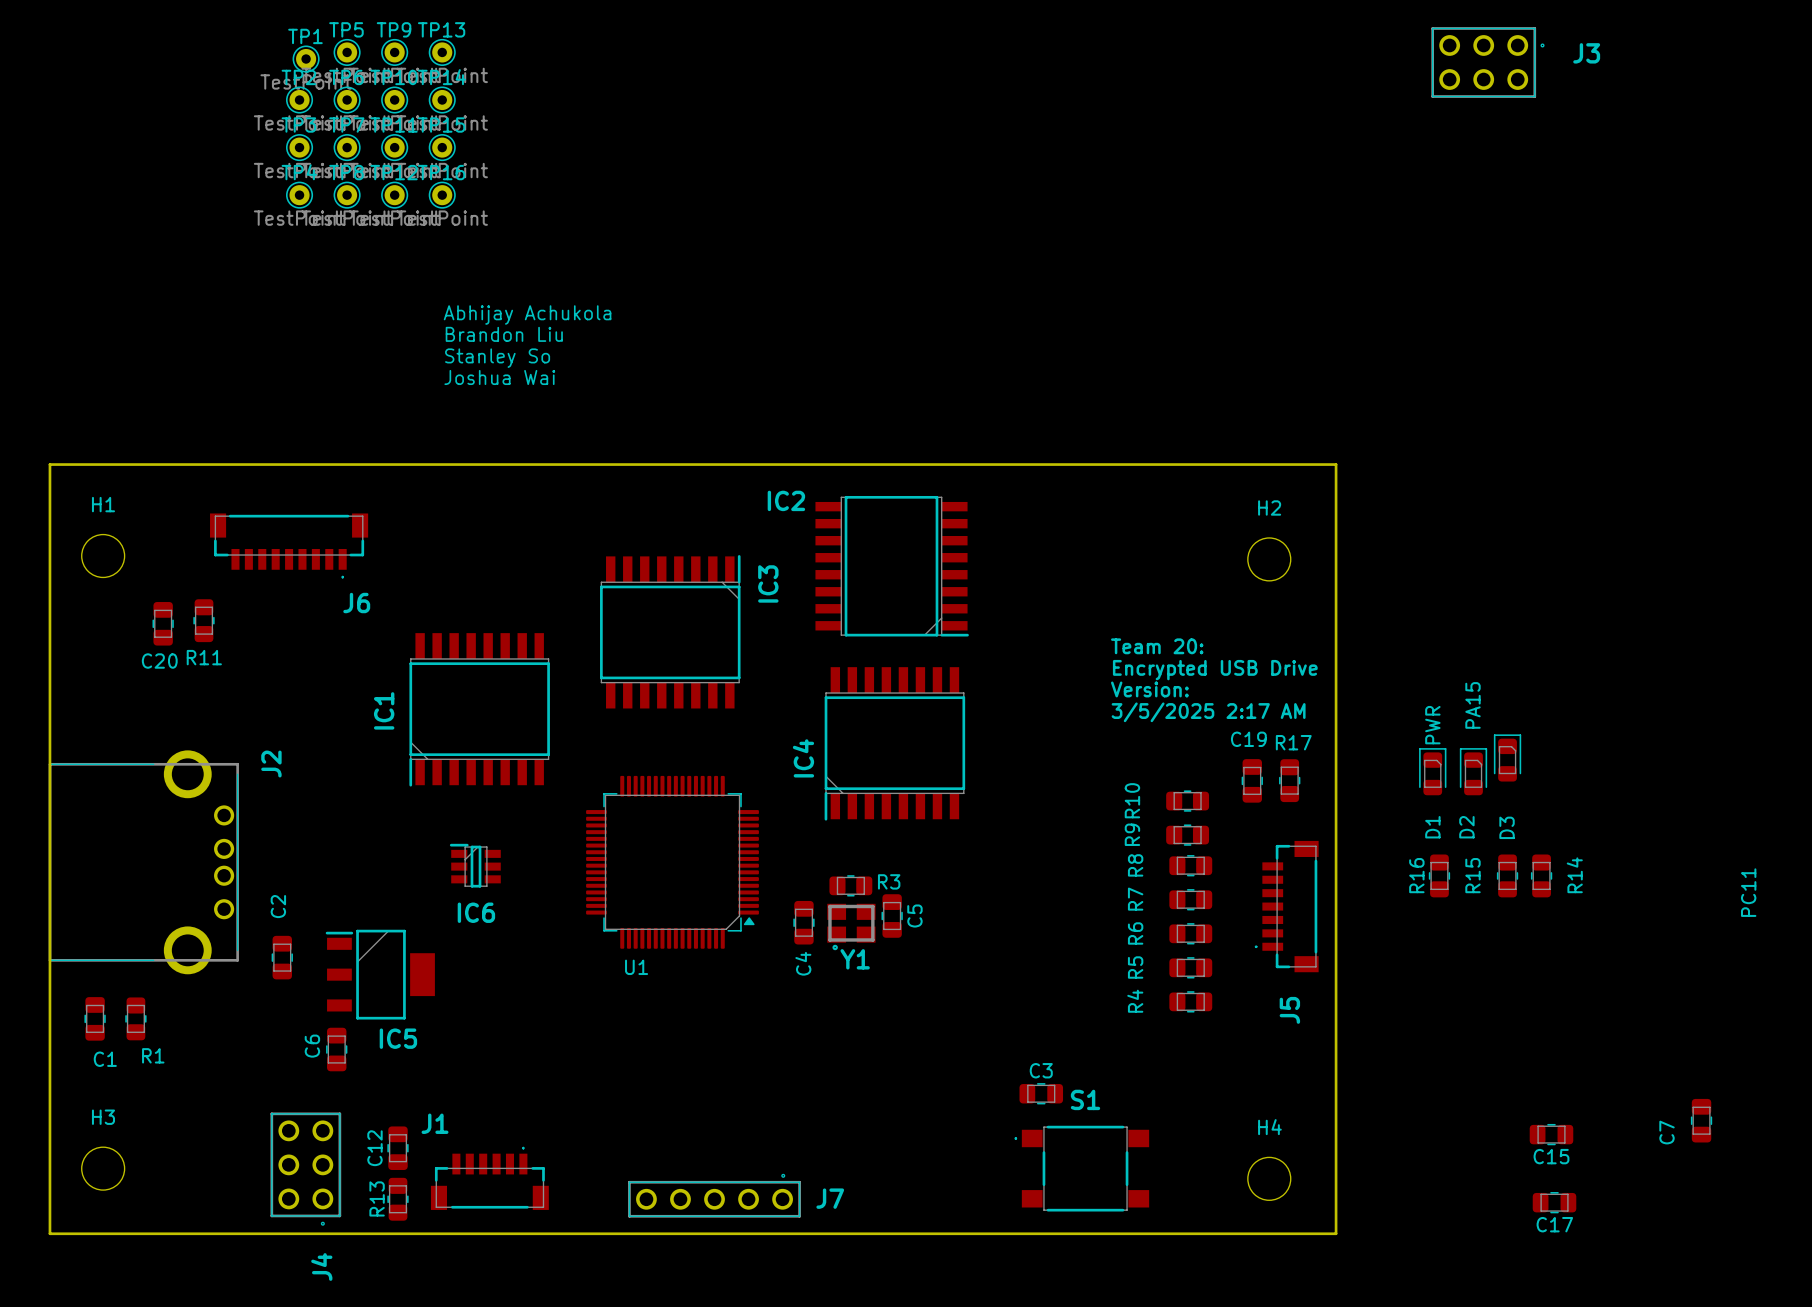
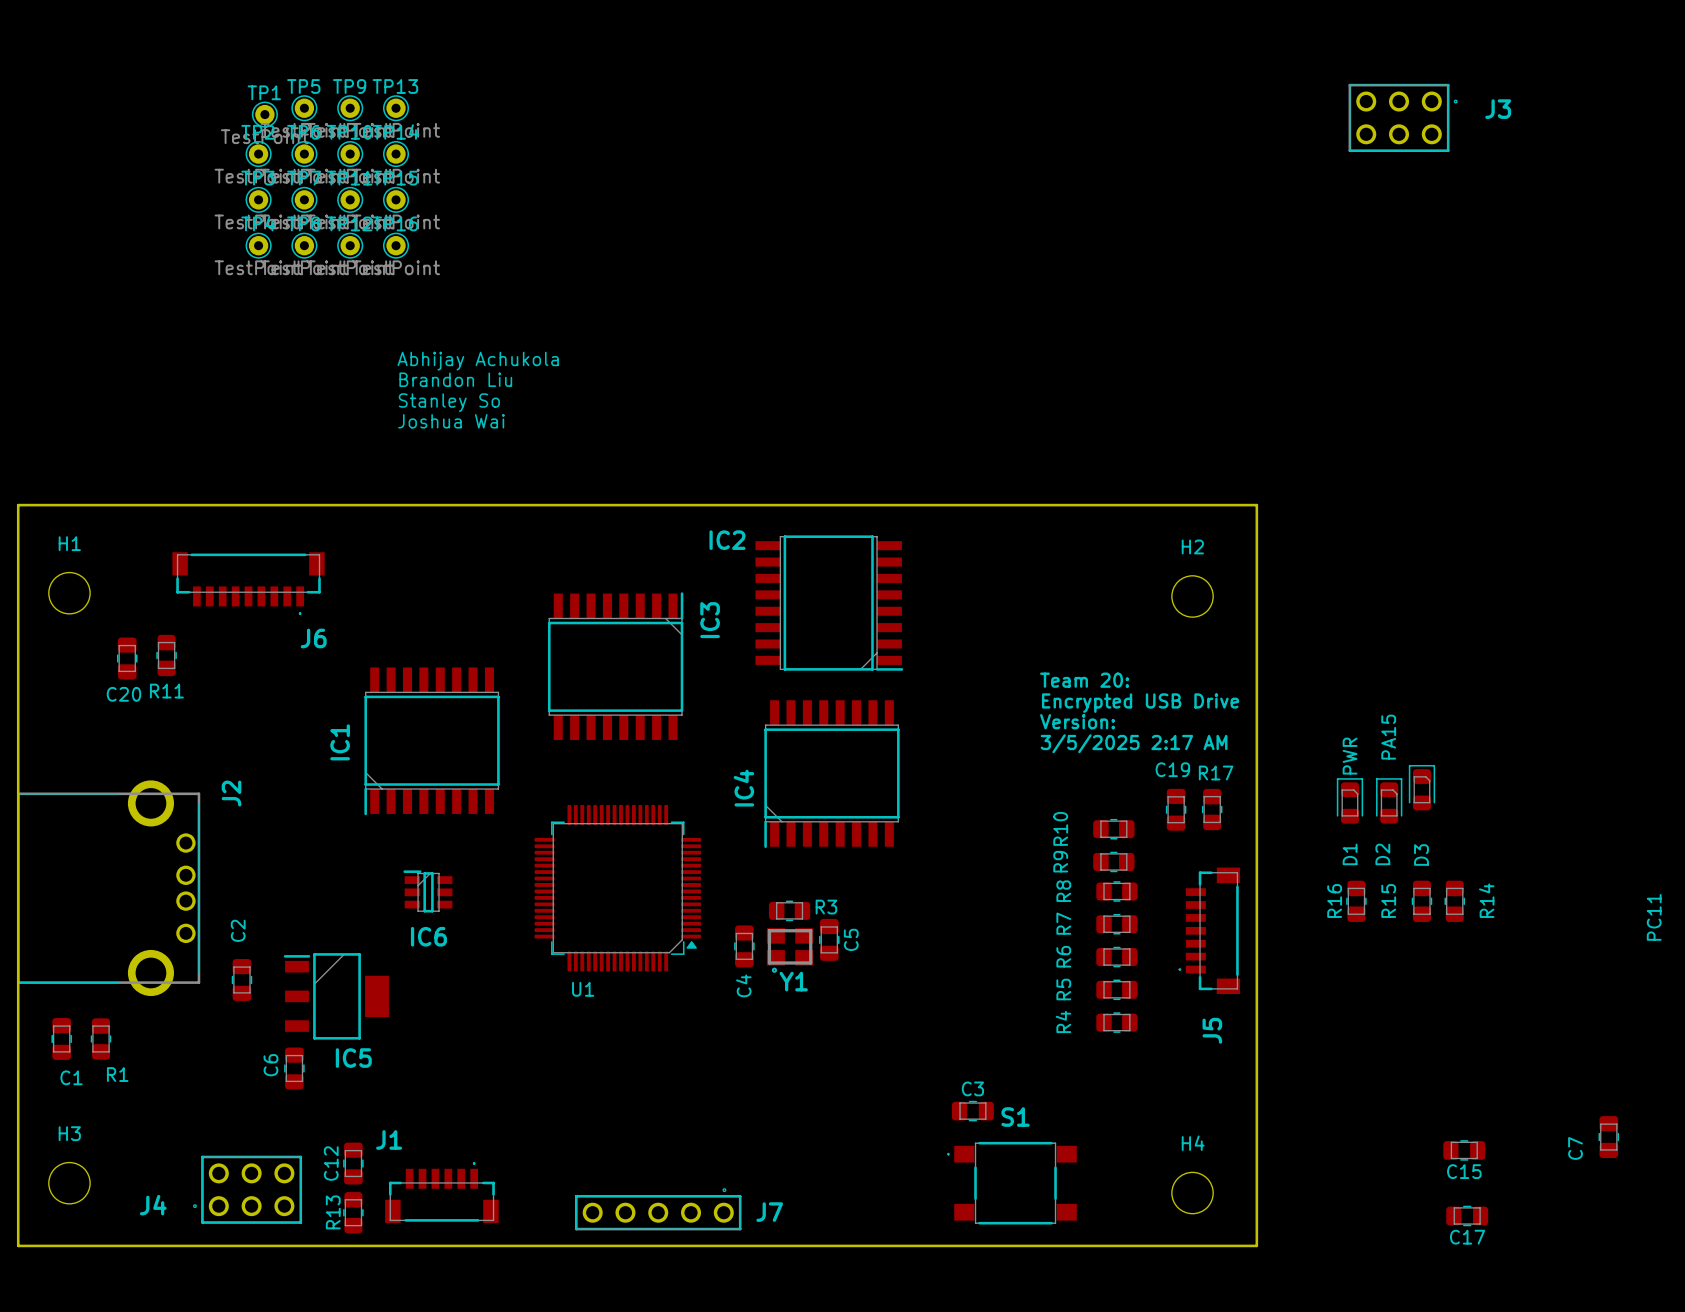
J4 rotation: 0° (305, 1169) -> 90° clockwise (247, 1189)

